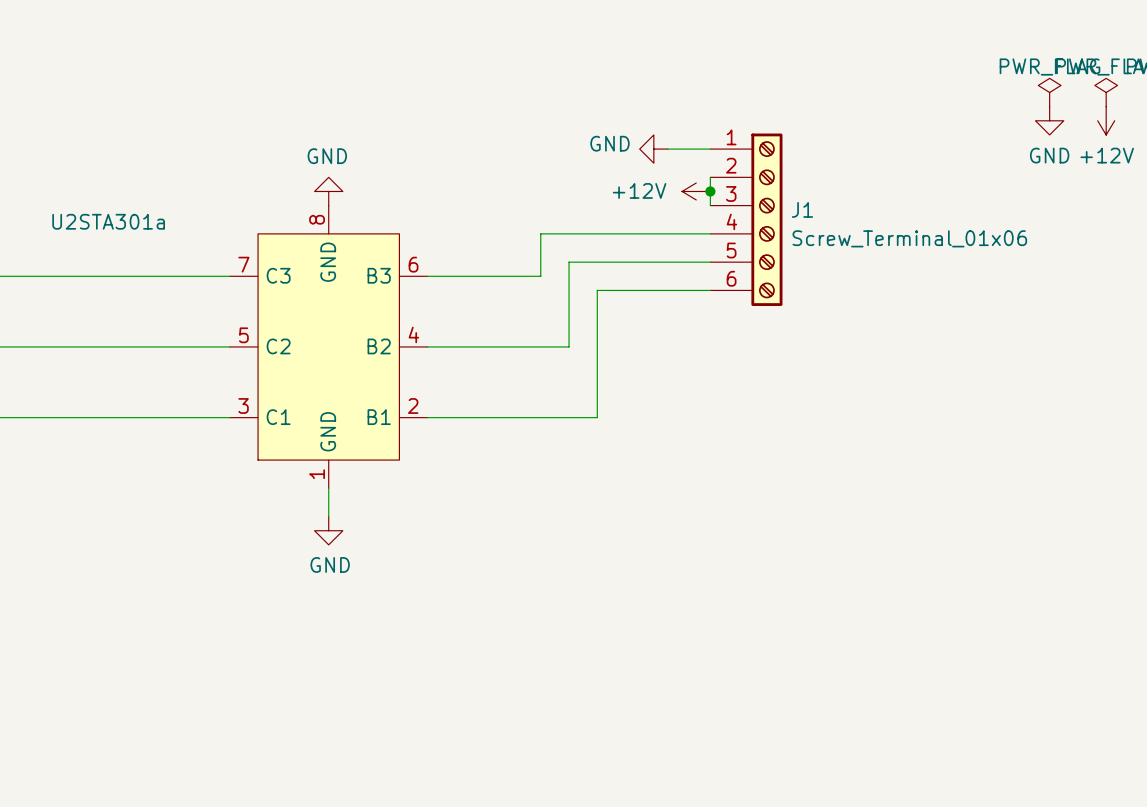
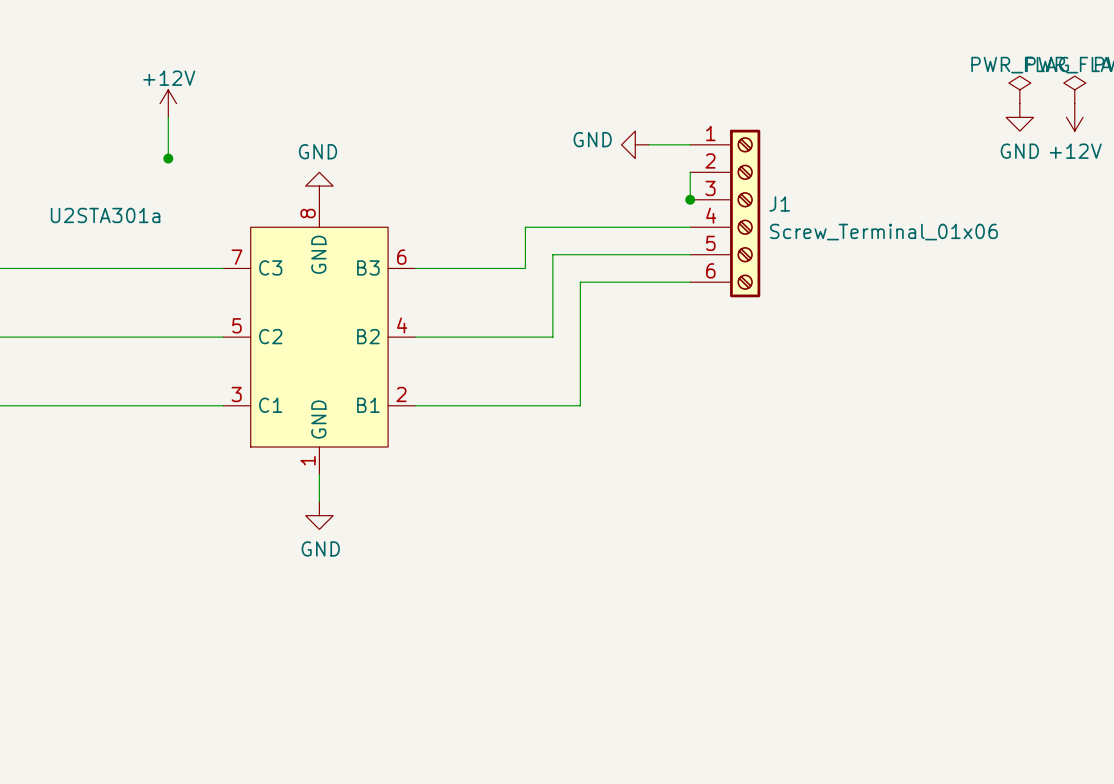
power symbol: none -> +12V (168, 103)
wire: none -> (168, 117) (168, 158)
junction: none -> (168, 158)
power symbol: +12V (696, 191) -> none
junction position: (710, 191) -> (690, 199)

